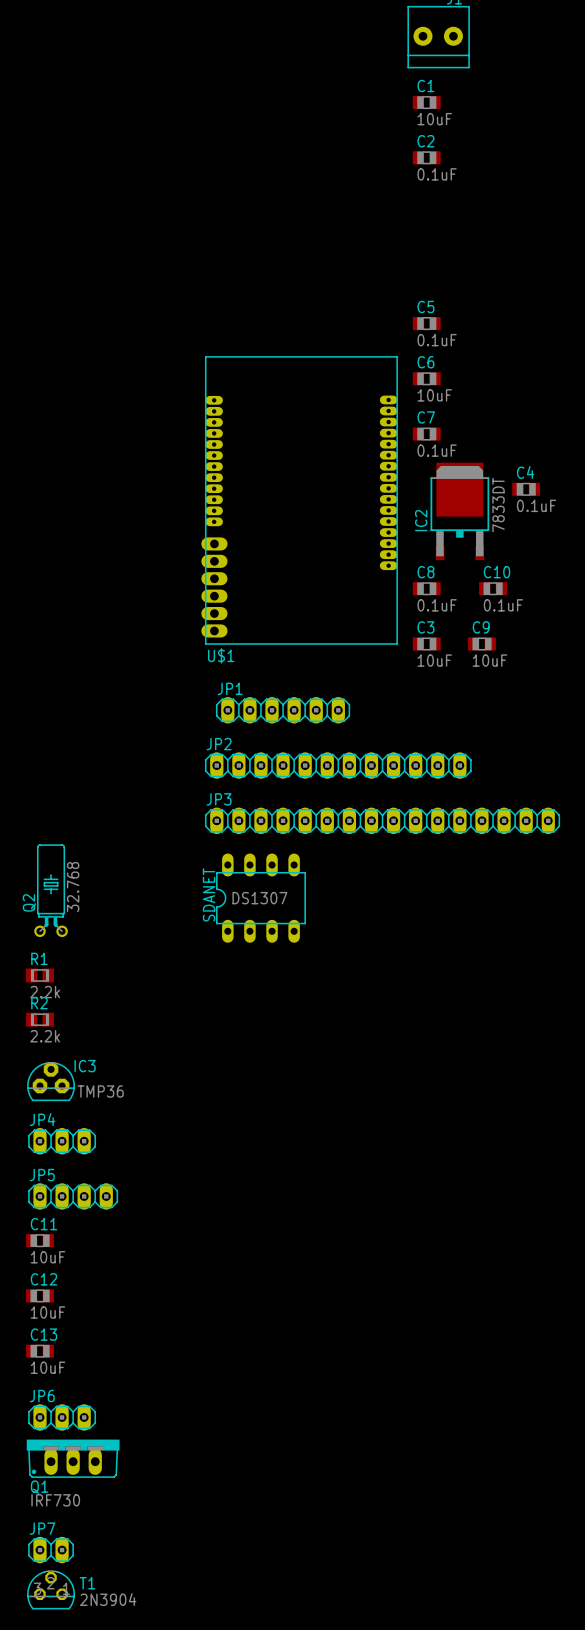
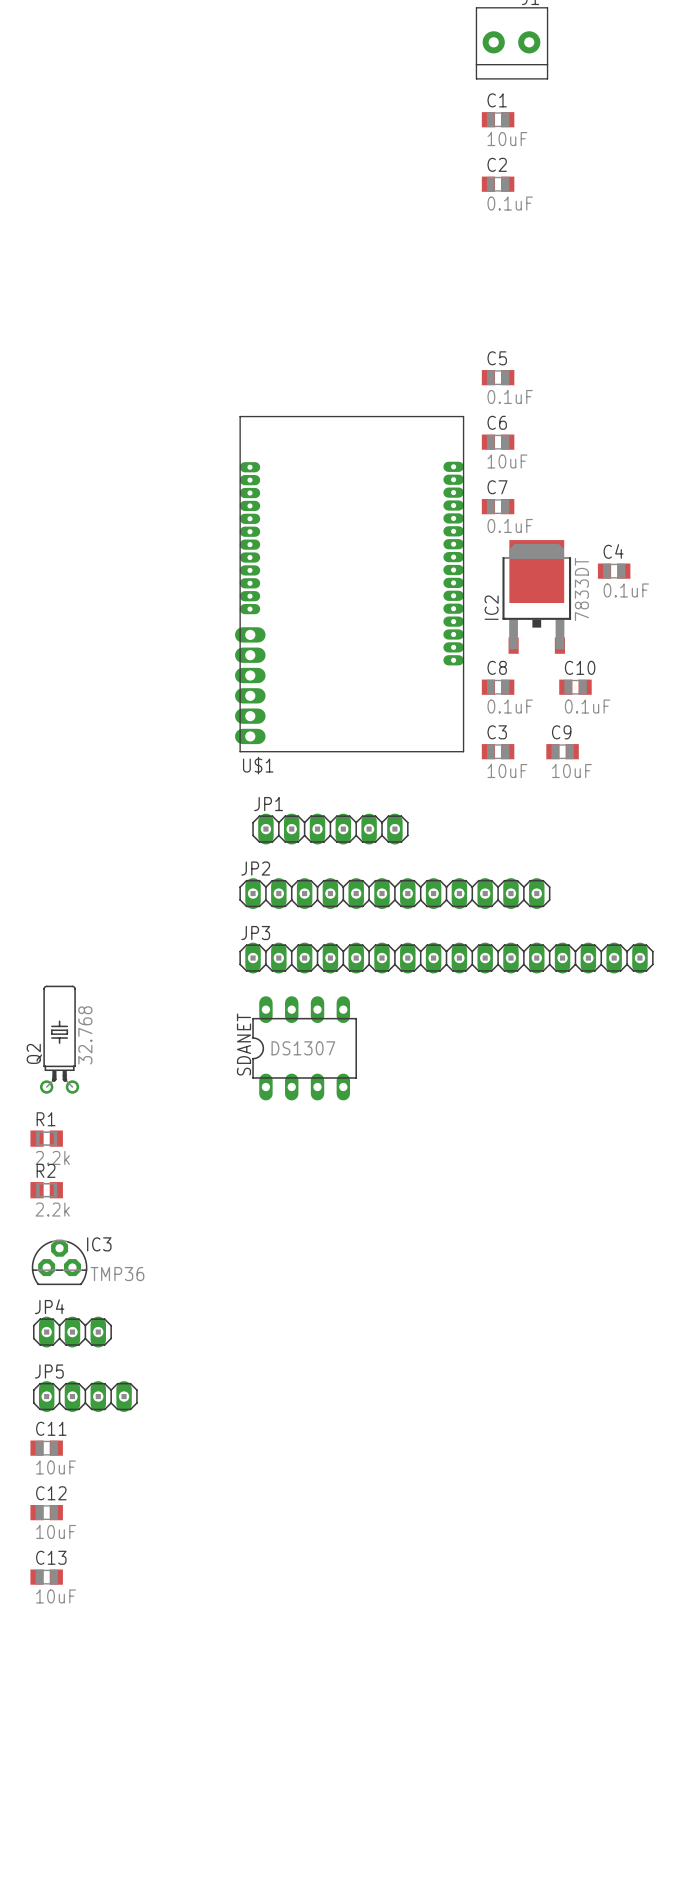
JP6: (62, 1417) -> none
Q1: IRF730 (73, 1458) -> none
JP7: (51, 1550) -> none
T1: 2N3904 (51, 1589) -> none

